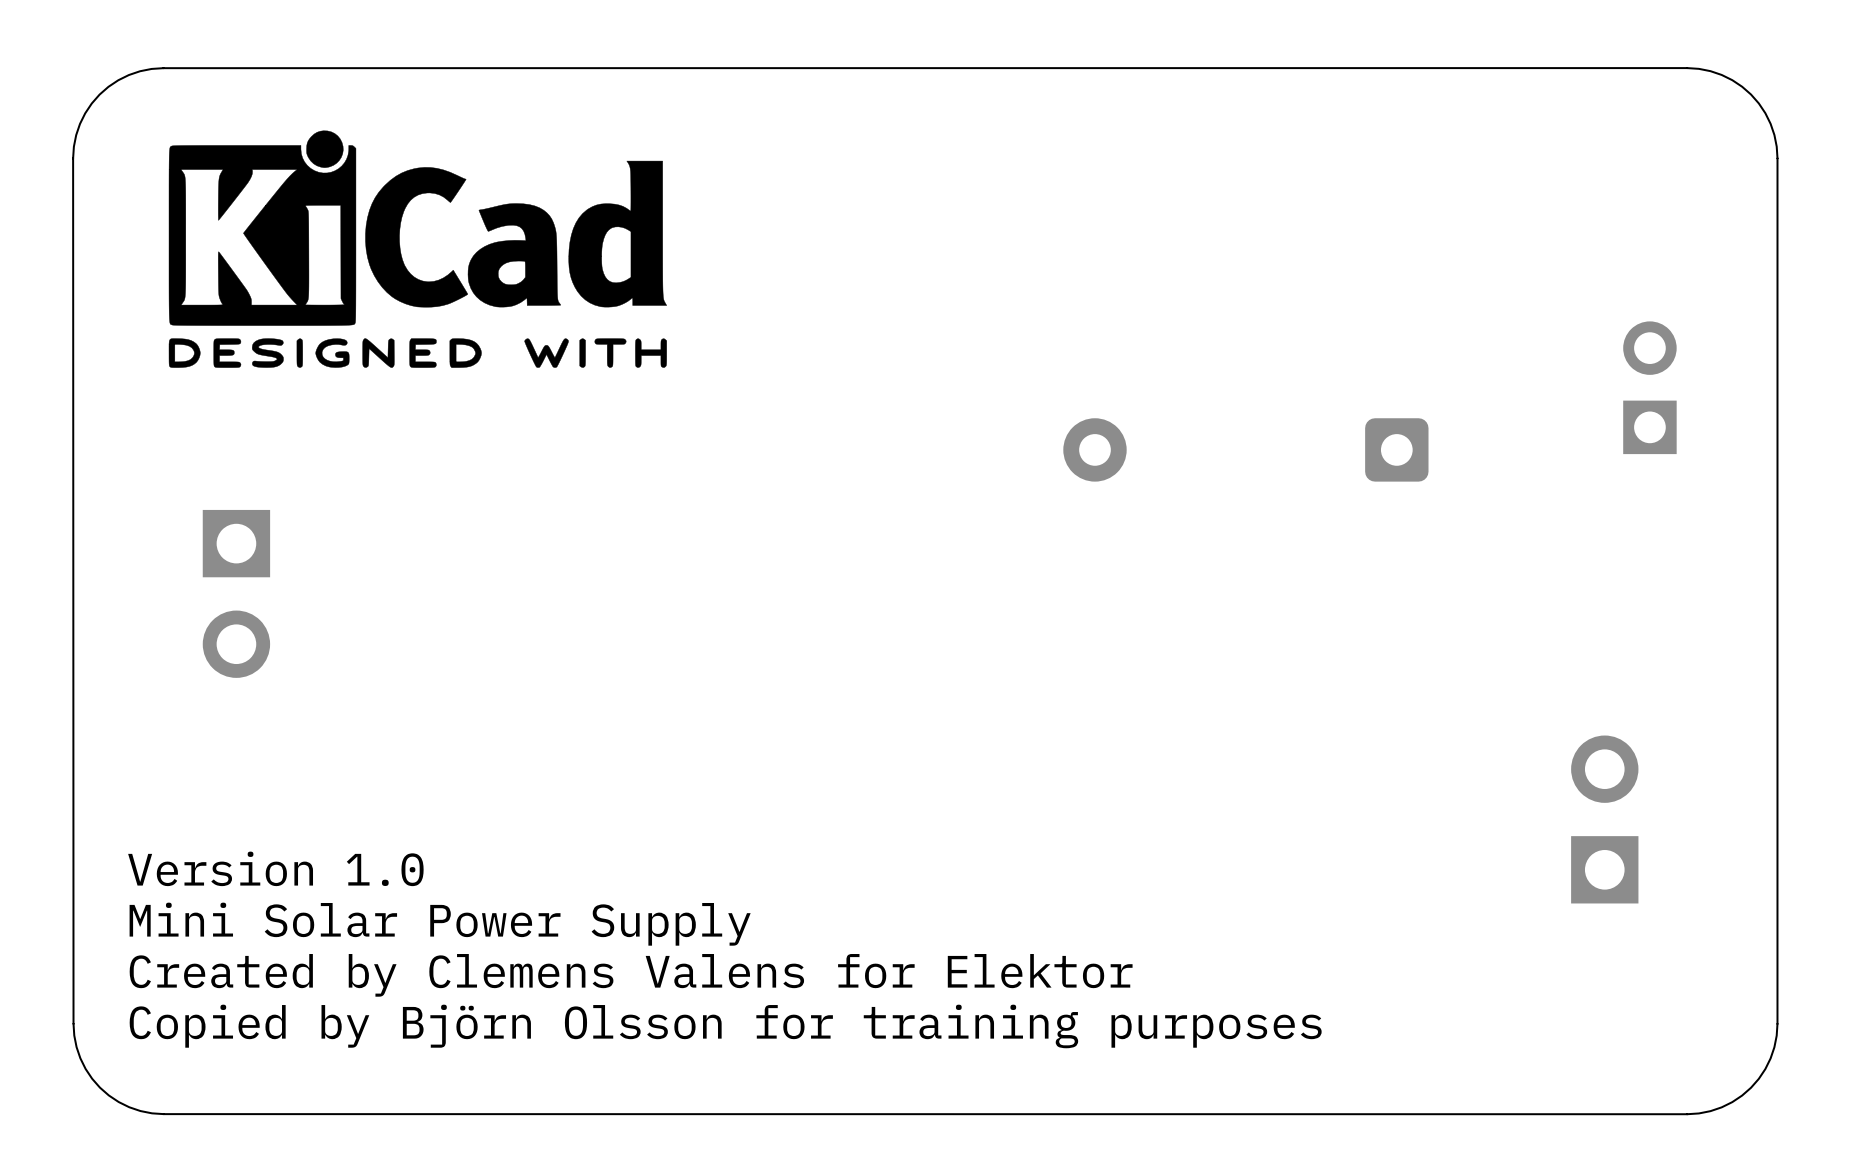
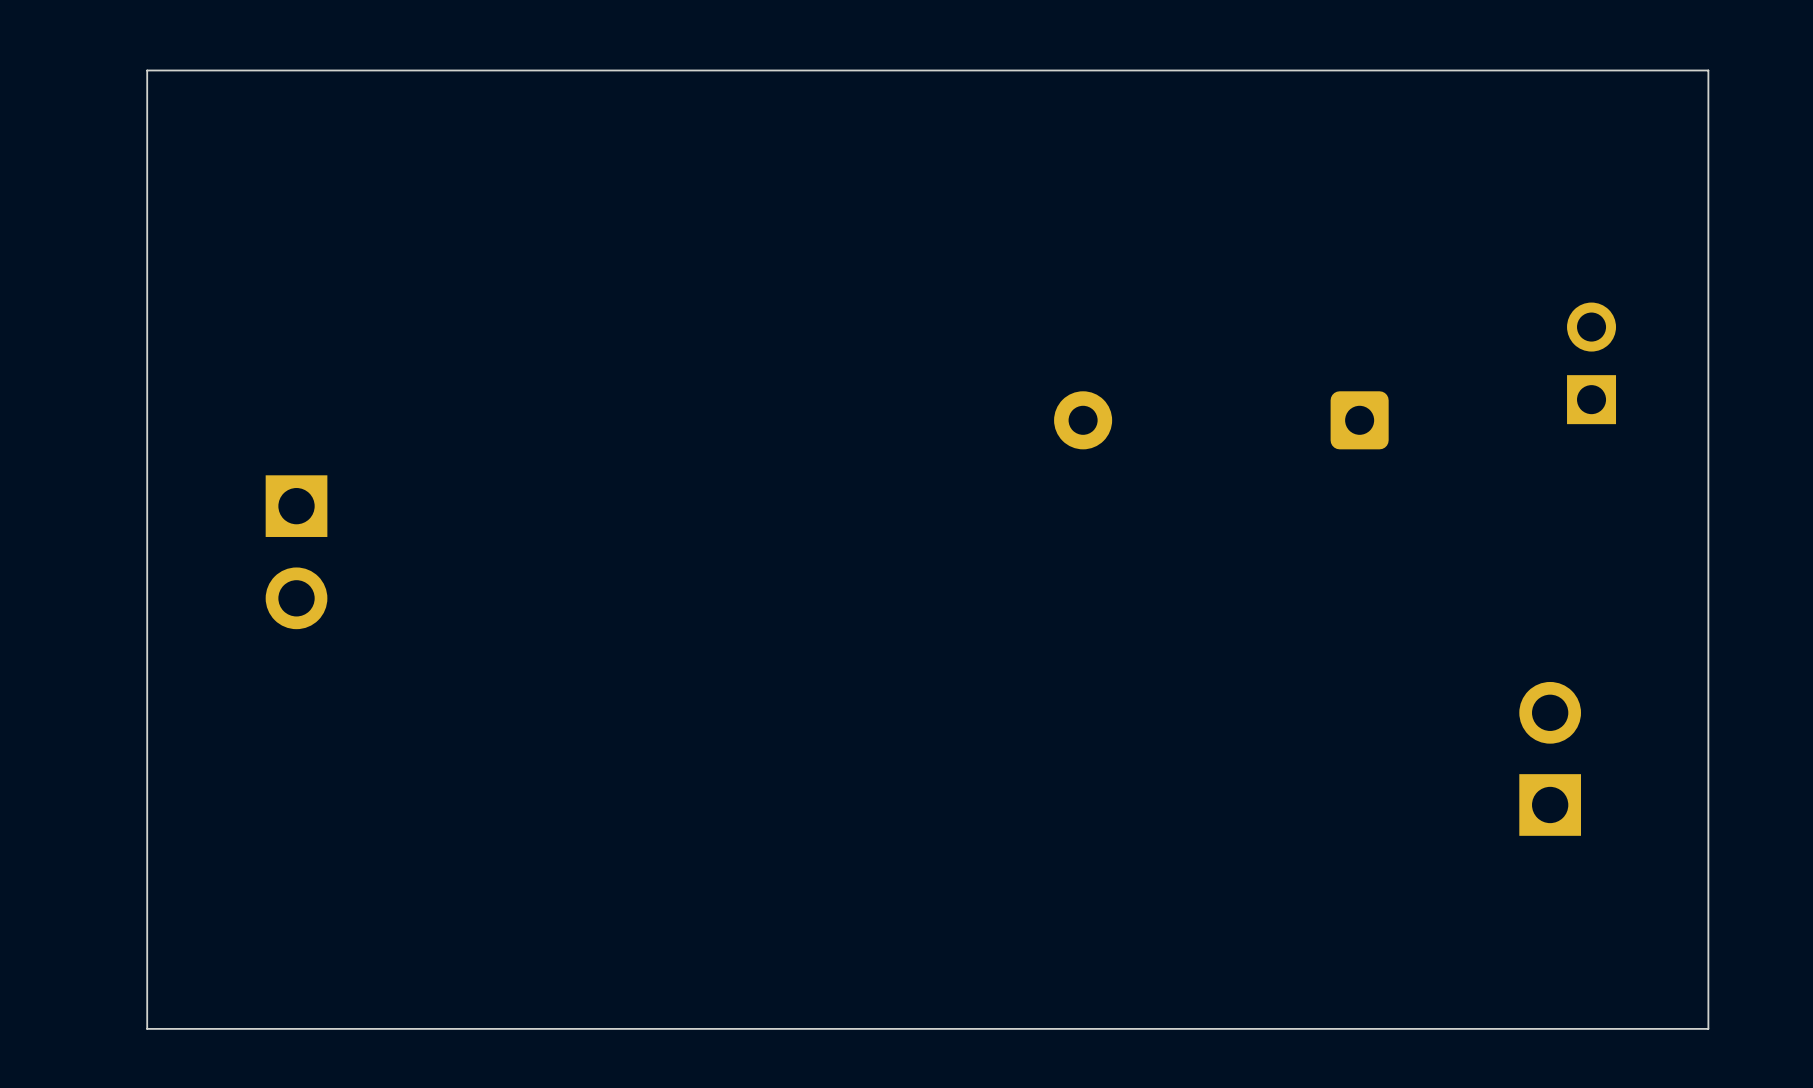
drawing: [168, 130, 667, 368] -> none
board edge: (1777, 158) (1776, 146) (1770, 123) (1765, 113) (1751, 94) (1732, 80) (1721, 74) (1698, 68) (1687, 68) (163, 68) (151, 68) (128, 75) (118, 80) (99, 94) (91, 103) (79, 123) (76, 135) (73, 158) (73, 1023) (76, 1047) (85, 1068) (99, 1087) (118, 1102) (140, 1111) (163, 1114) (1687, 1114) (1698, 1113) (1721, 1107) (1742, 1095) (1751, 1087) (1758, 1078) (1770, 1058) (1776, 1035) (1777, 1023) -> (1708, 153) (1708, 70) (147, 70) (147, 1028) (1708, 1028) (1708, 946)
text: Version 1.0 (275, 868) -> none
text: Mini Solar Power Supply (440, 924) -> none
text: Created by Clemens Valens for Elektor (631, 975) -> none
text: Copied by Björn Olsson for training purposes (725, 1026) -> none

